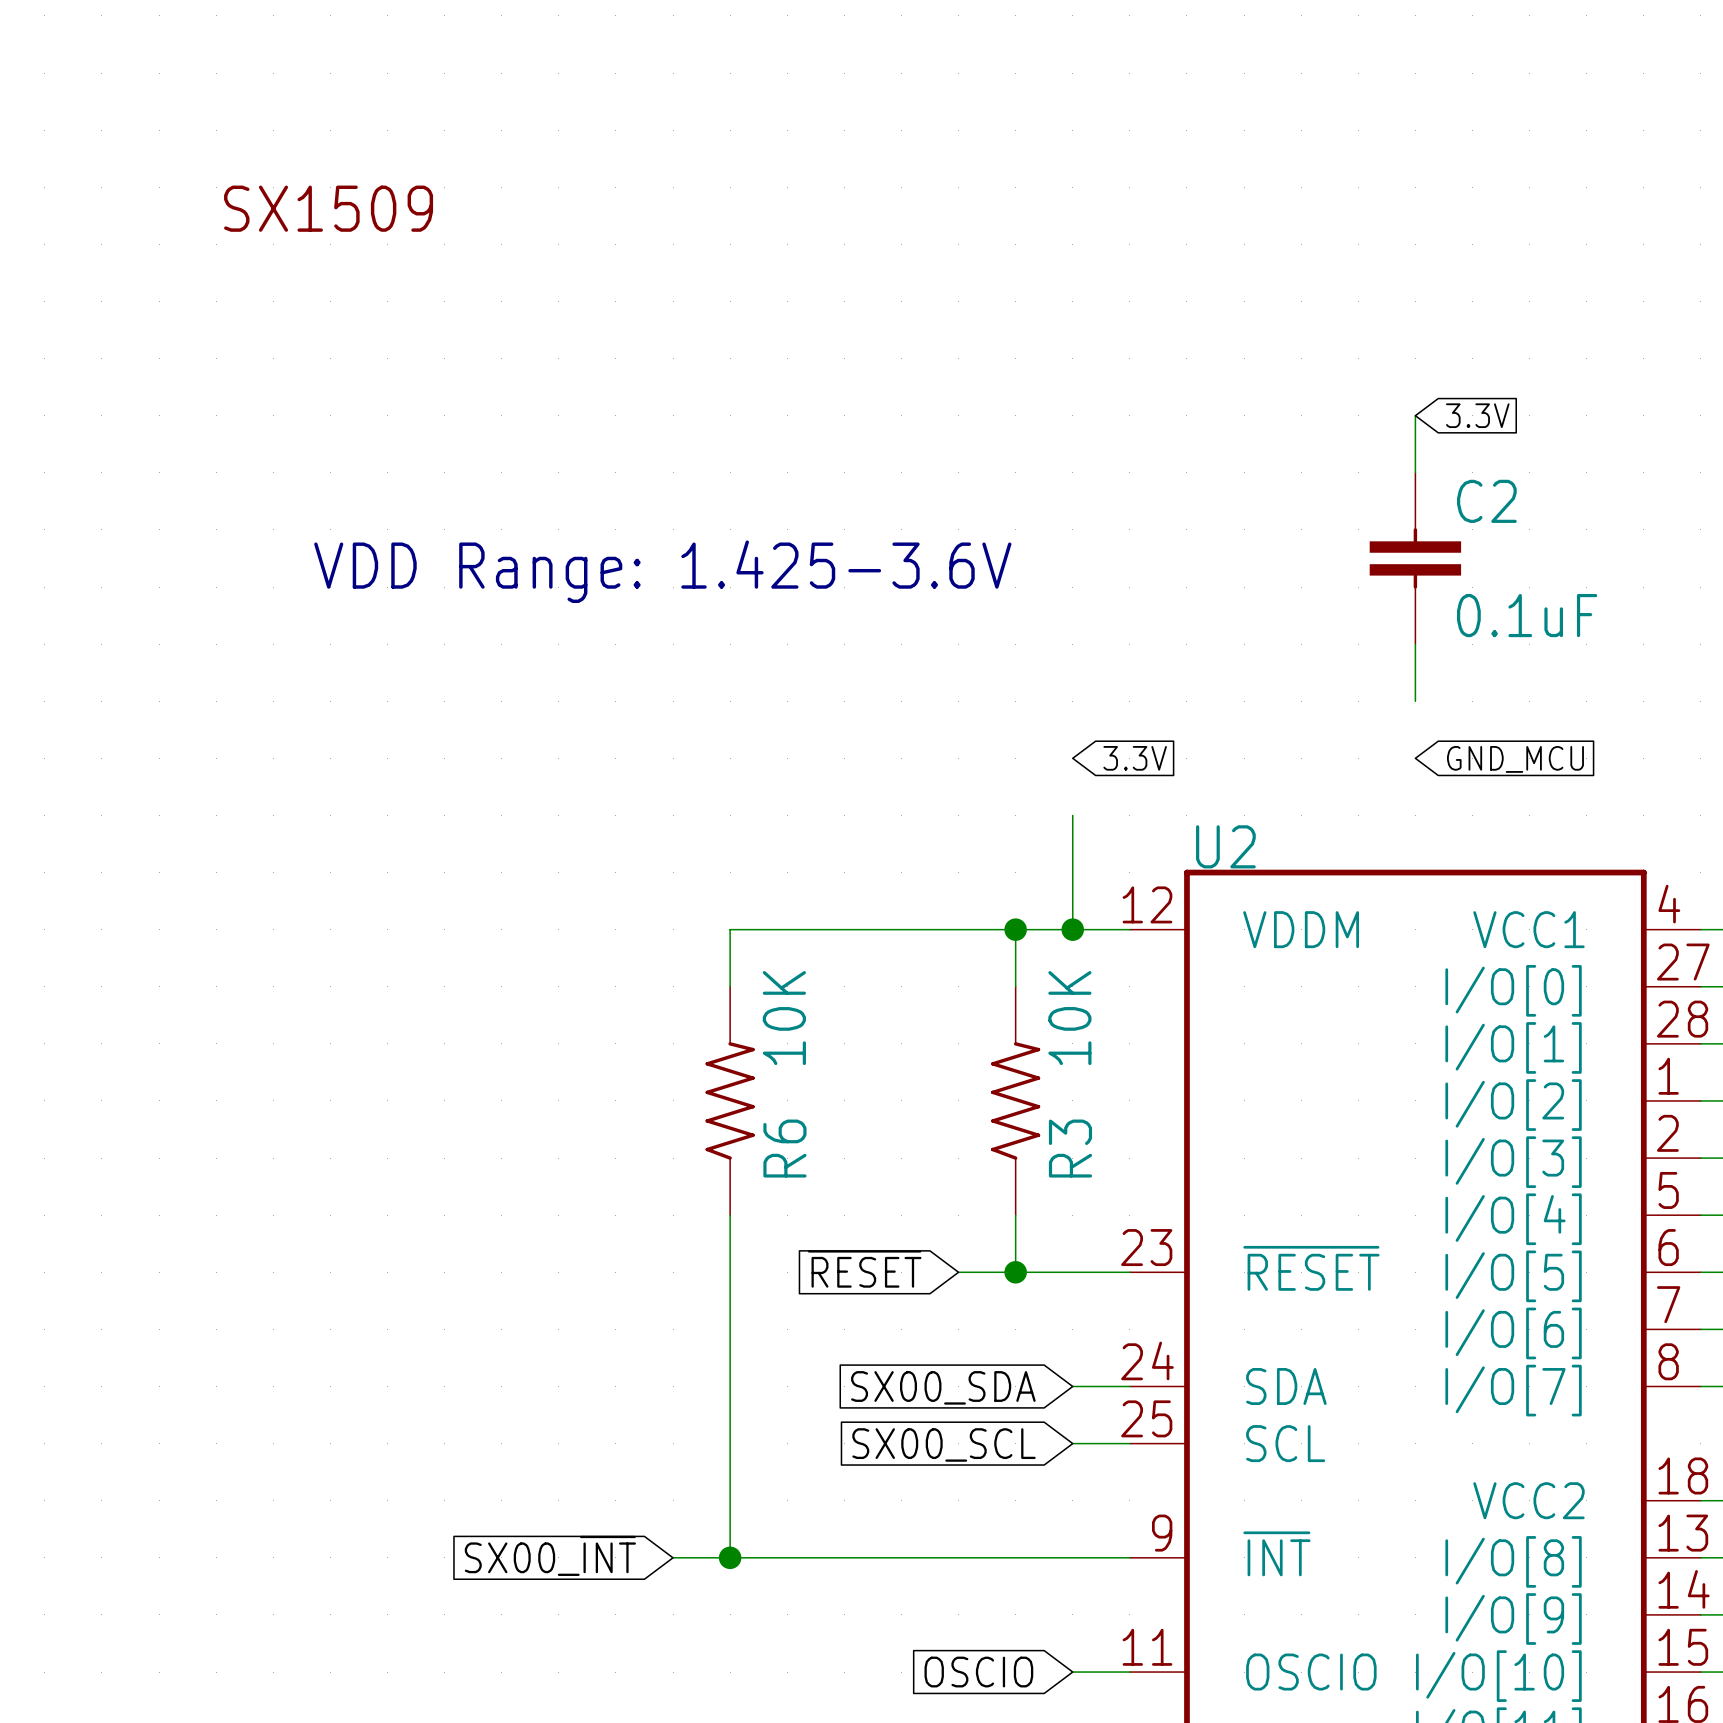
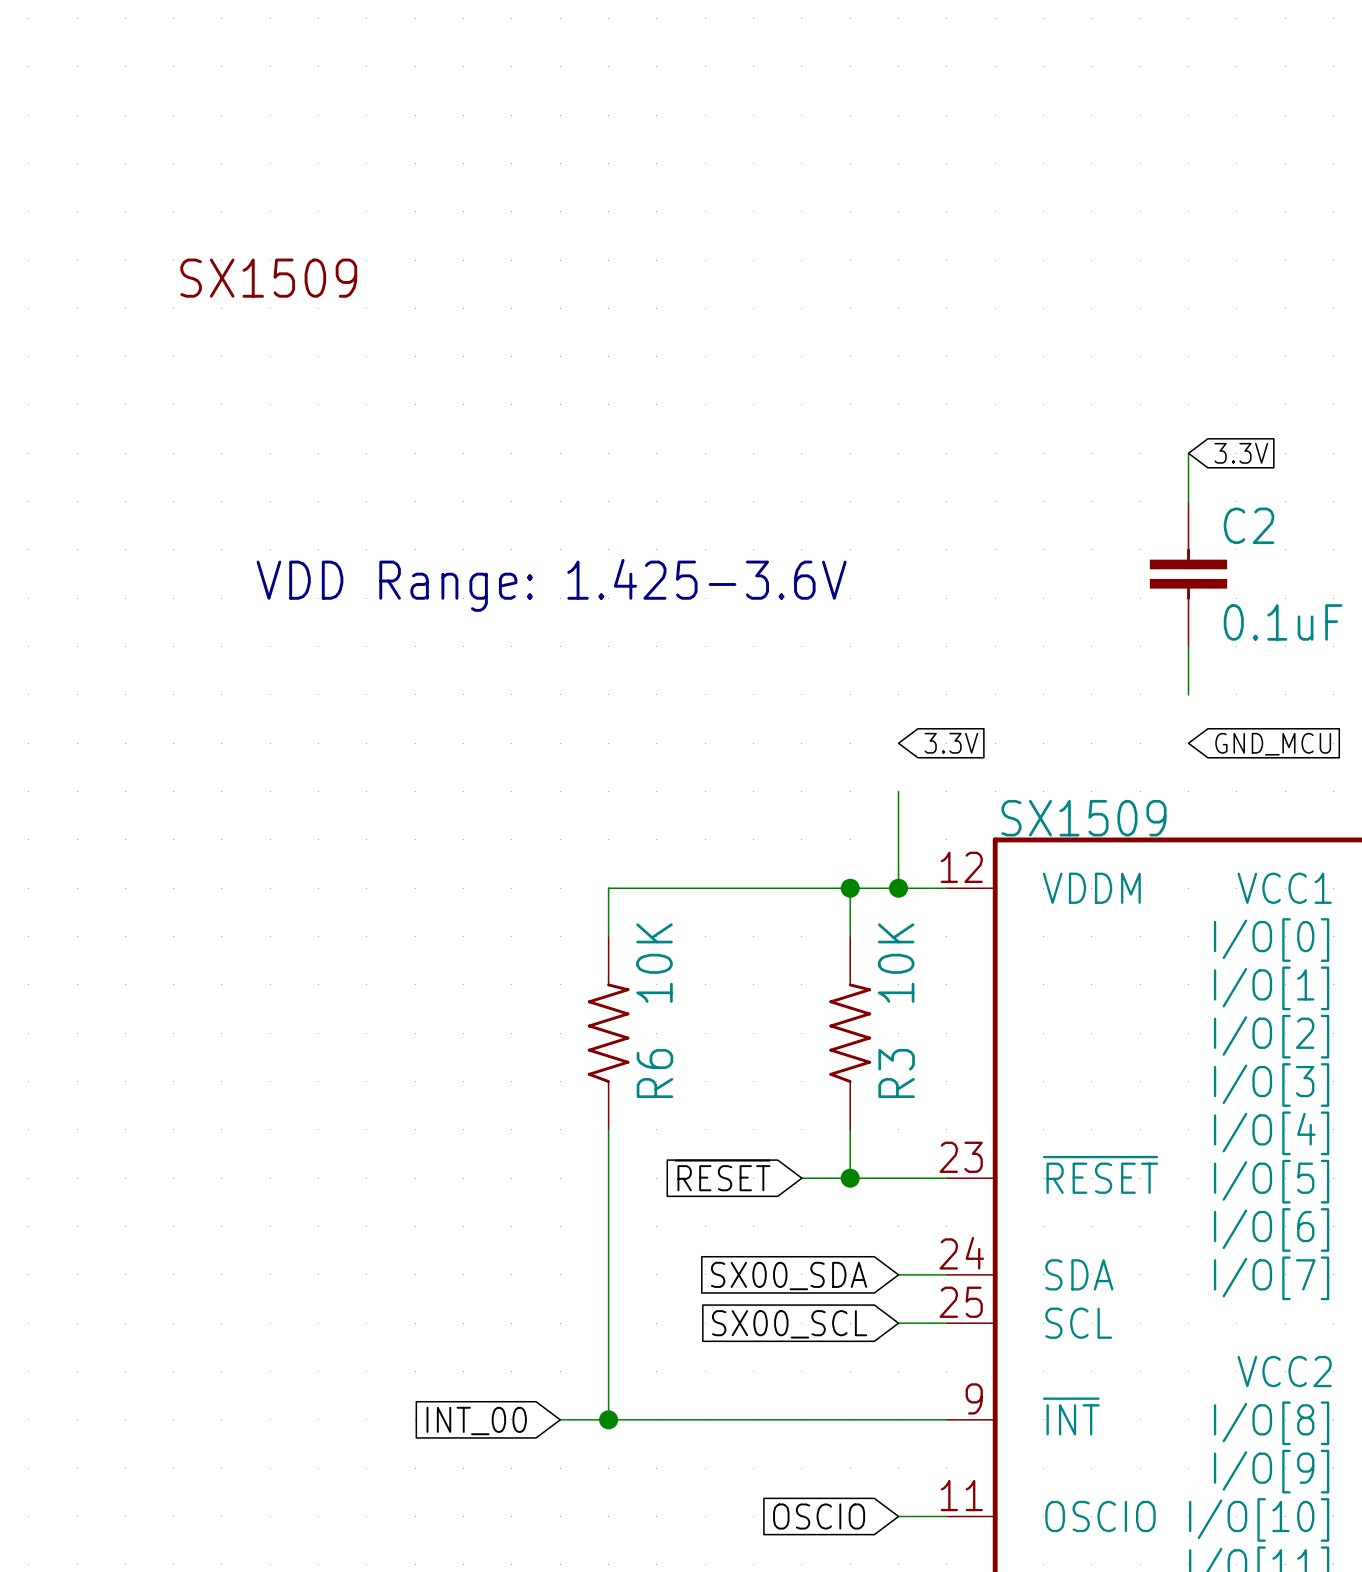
U2 name: U2 (1225, 846) -> SX1509 (1083, 818)
global label: SX00_~{INT} (550, 1555) -> INT_00 (476, 1420)

